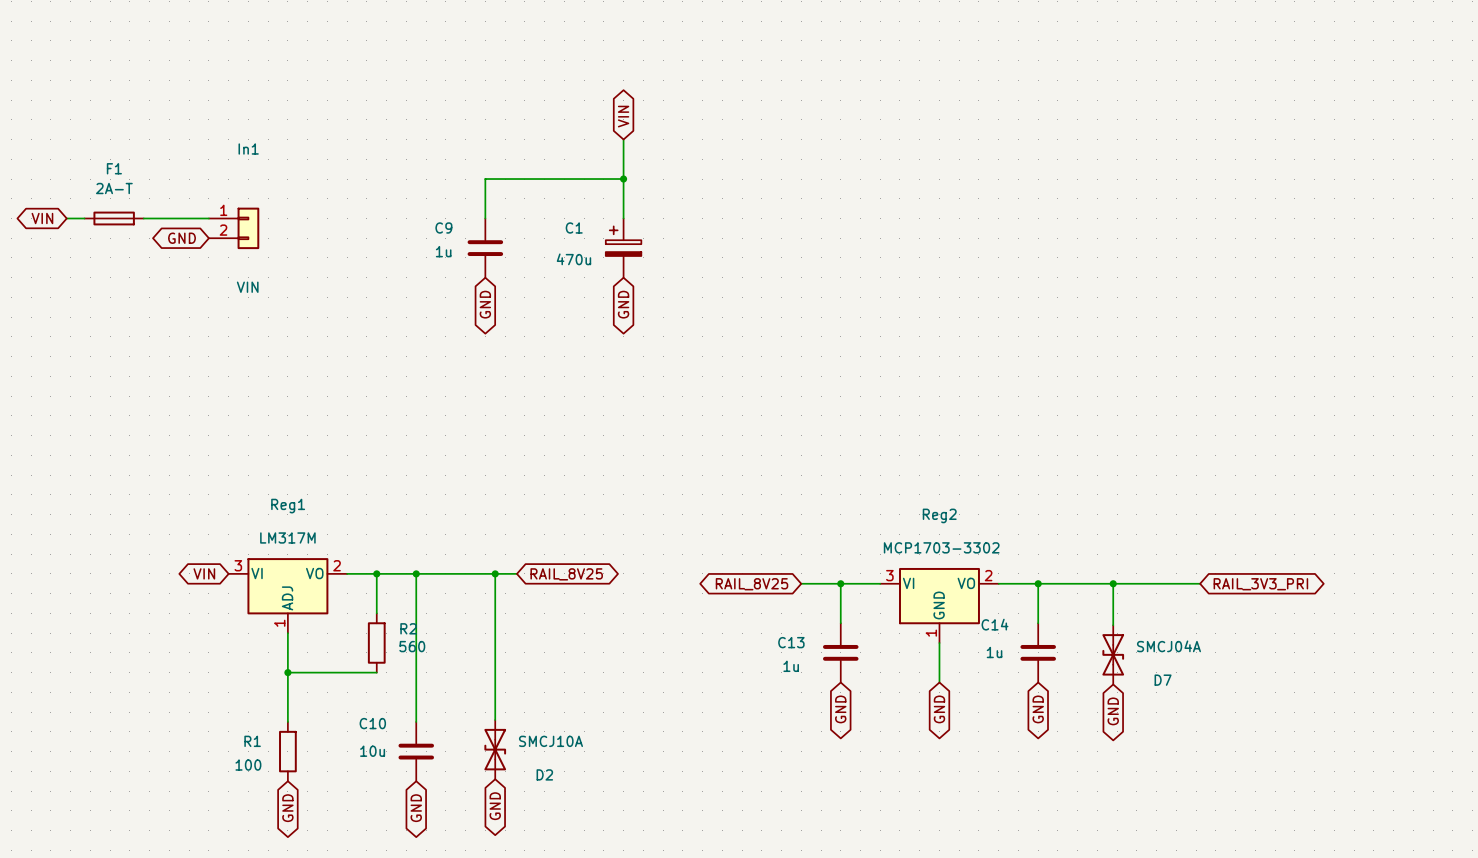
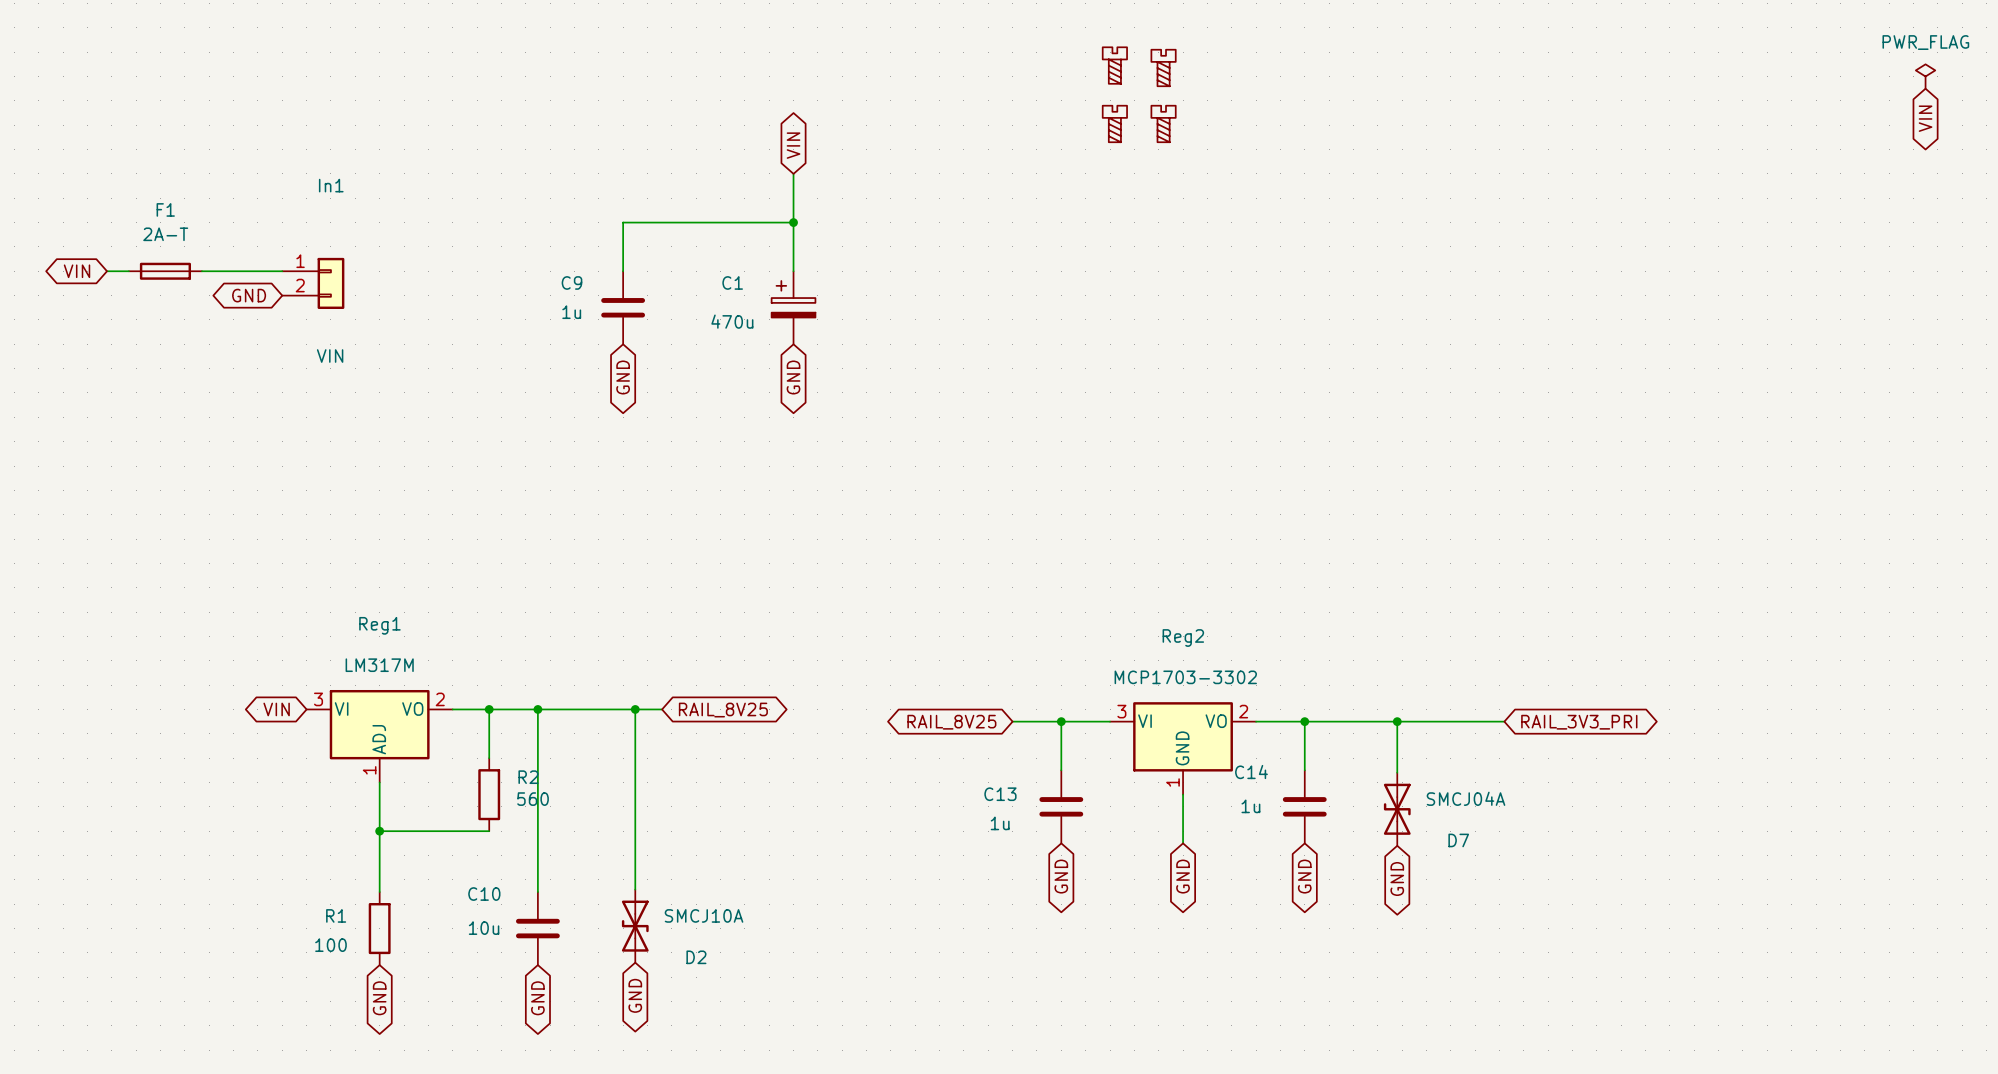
part: none -> (1114, 65)
part: none -> (1163, 67)
part: none -> (1114, 123)
part: none -> (1163, 123)

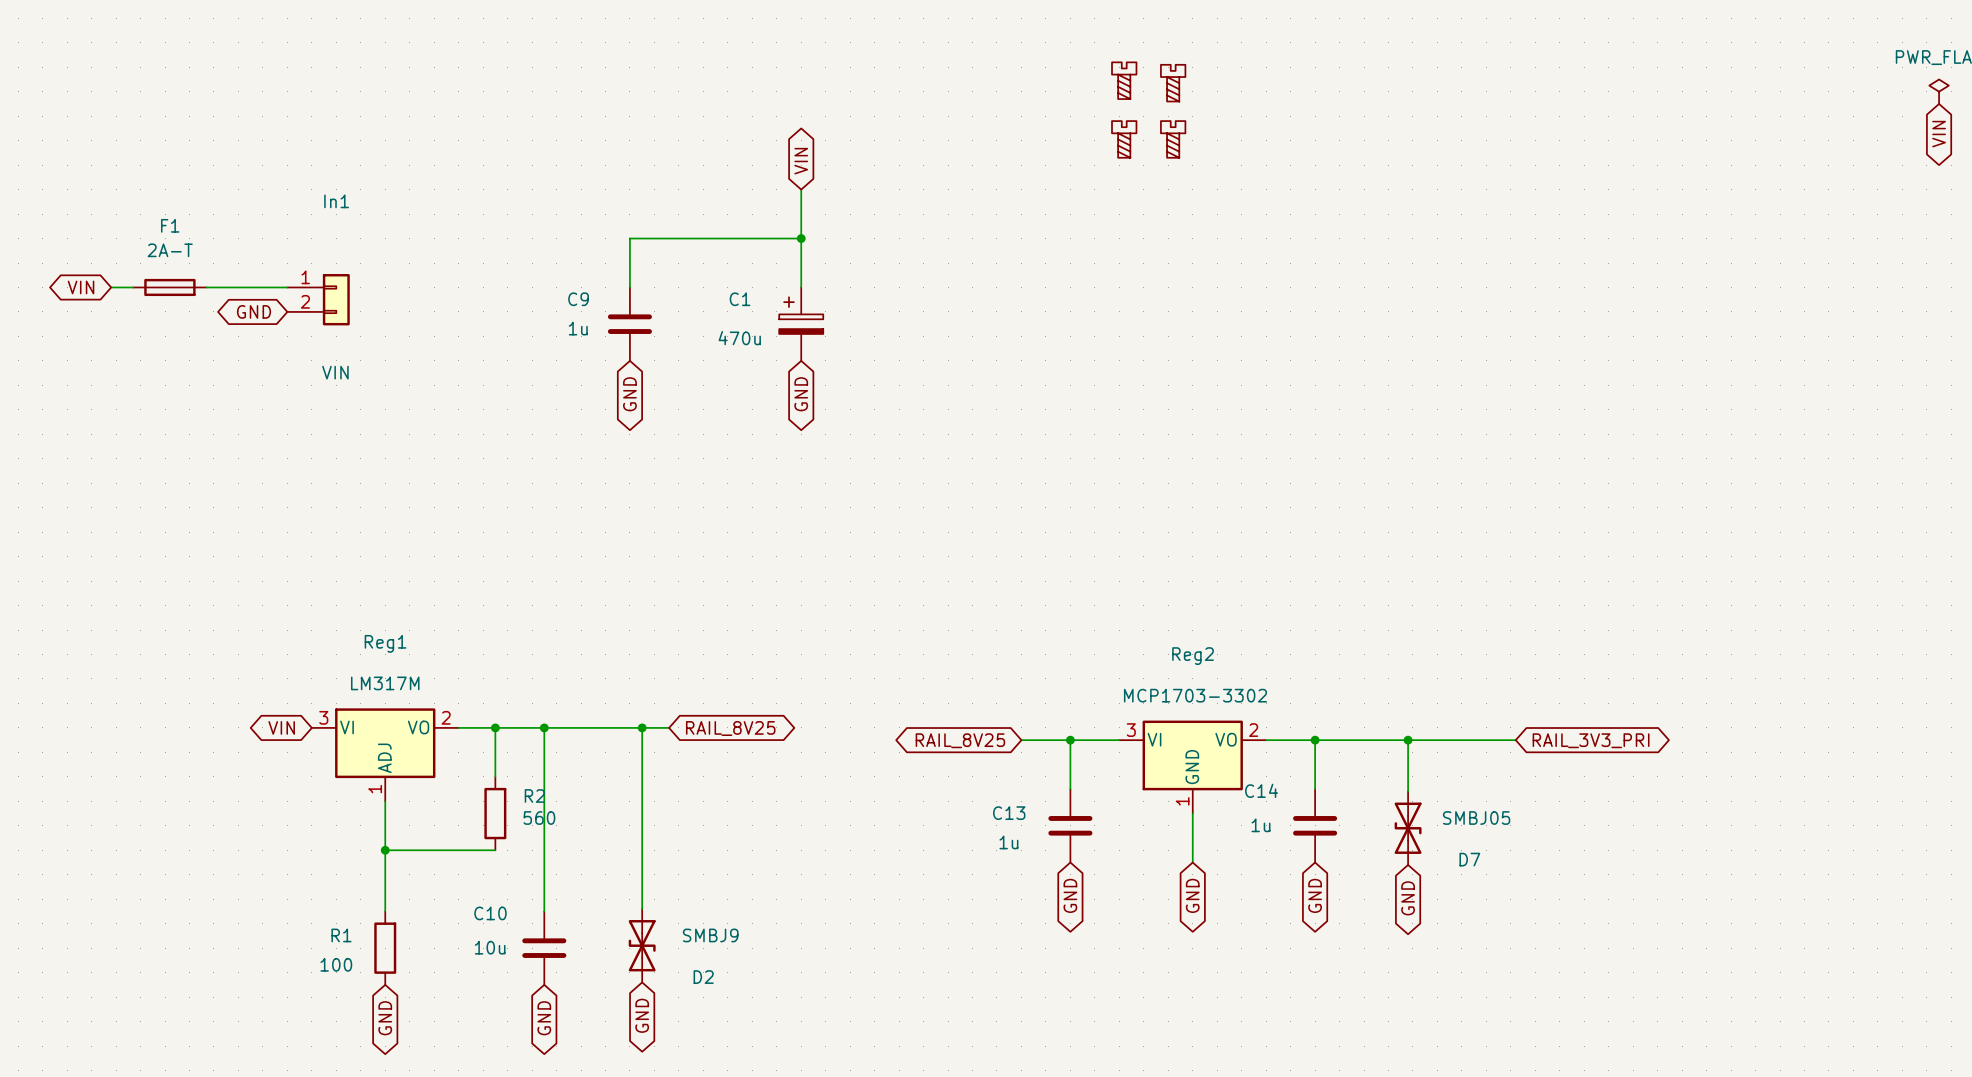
D7 value: SMCJ04A (1466, 798) -> SMBJ05 (1476, 818)
D2 value: SMCJ10A (704, 915) -> SMBJ9 (710, 935)

